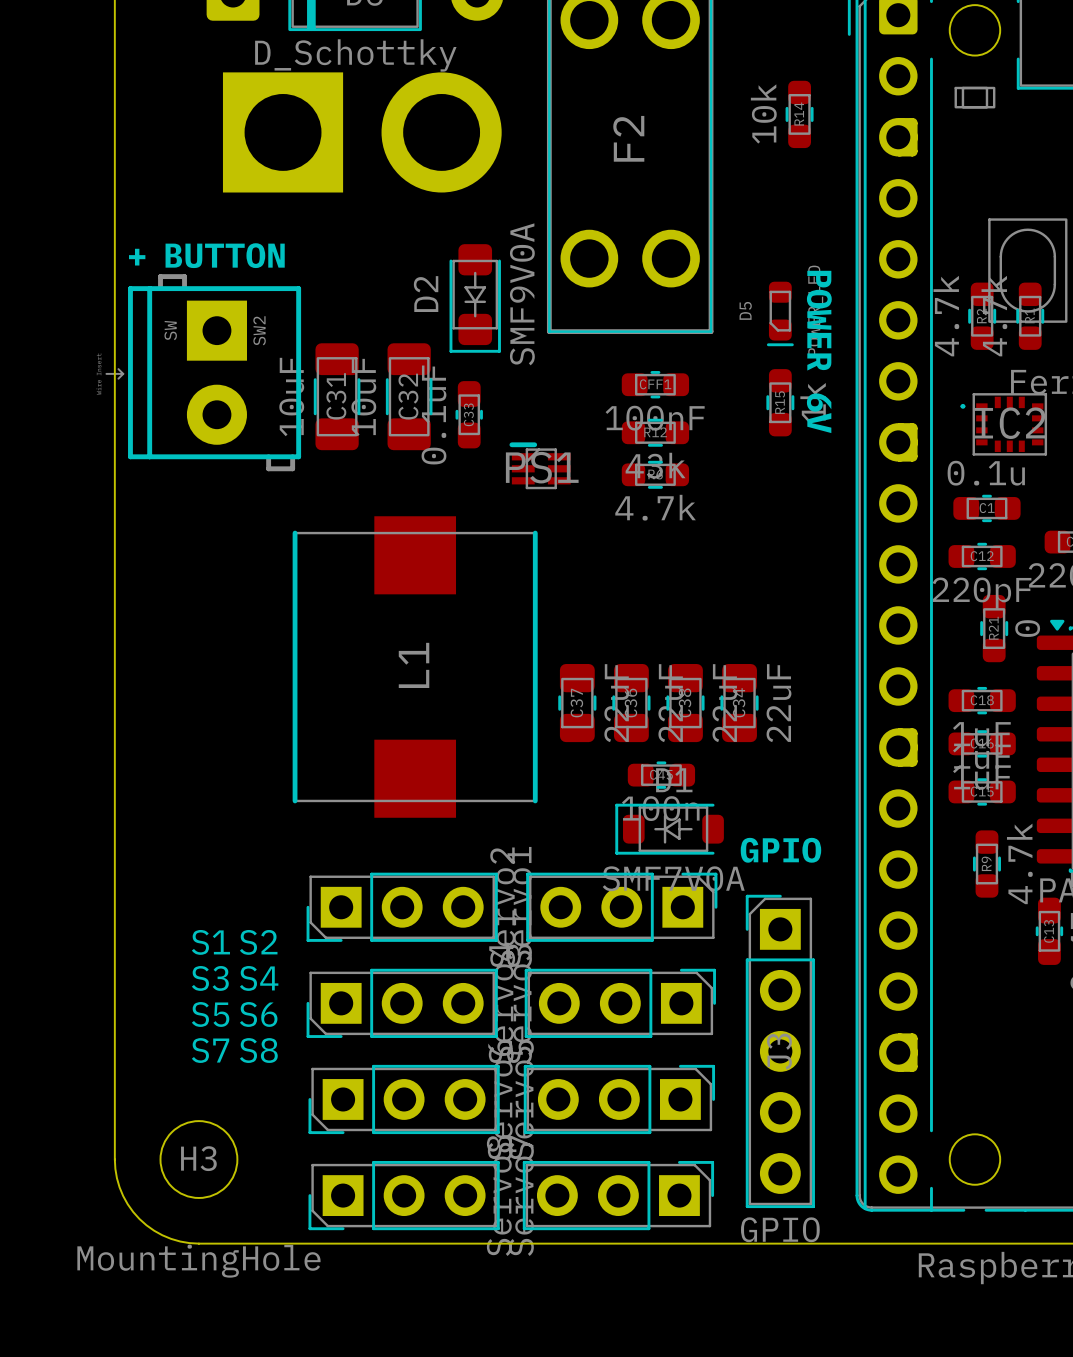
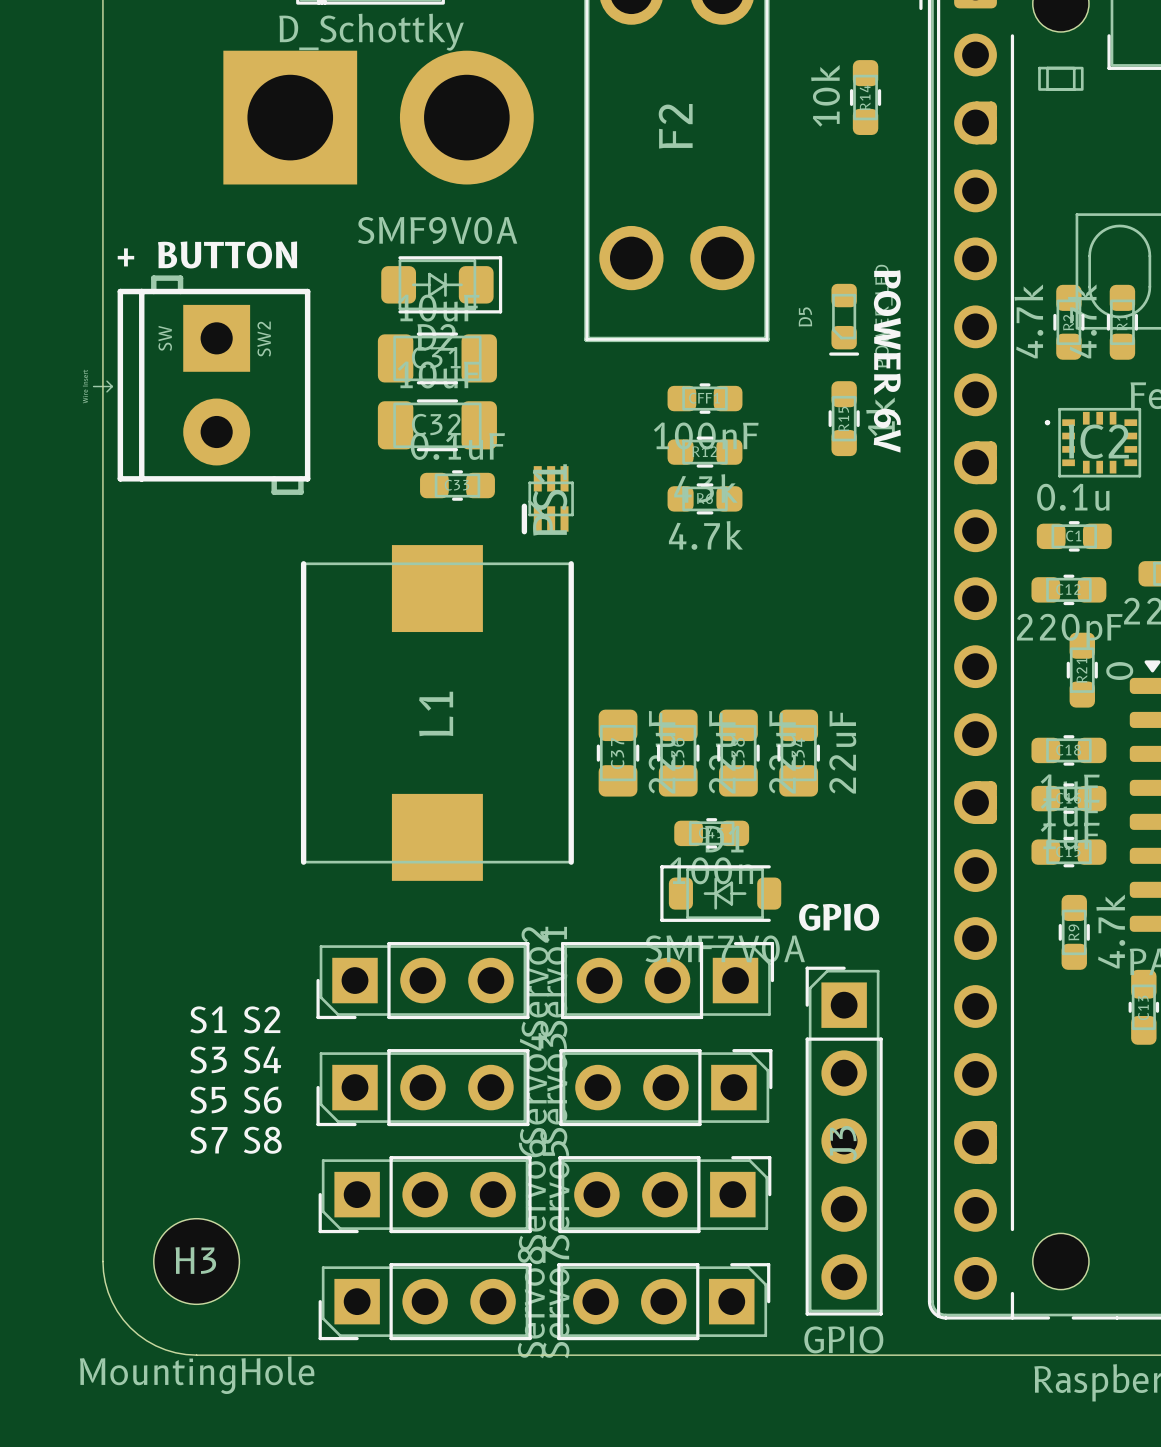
D2 rotation: 0° (475, 298) -> 90° counterclockwise (441, 284)
C31 rotation: 0° (337, 396) -> 90° clockwise (437, 358)
C31 position: (337, 396) -> (437, 358)
C32 rotation: 0° (409, 396) -> 90° clockwise (437, 425)
C33 rotation: 0° (469, 414) -> 90° clockwise (457, 485)
C33 position: (469, 414) -> (457, 485)
PS1 rotation: 0° (540, 465) -> 90° counterclockwise (547, 500)

